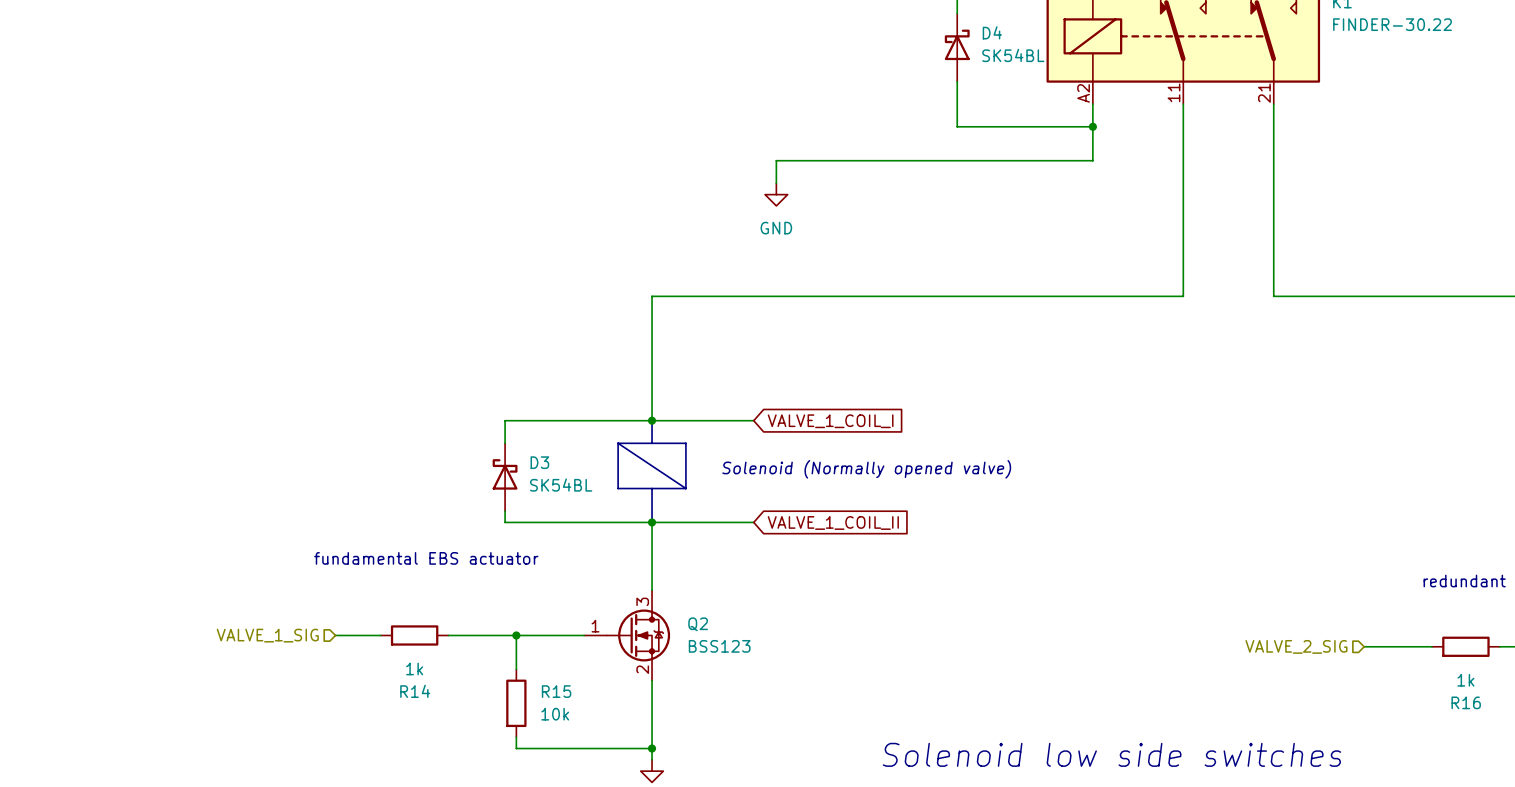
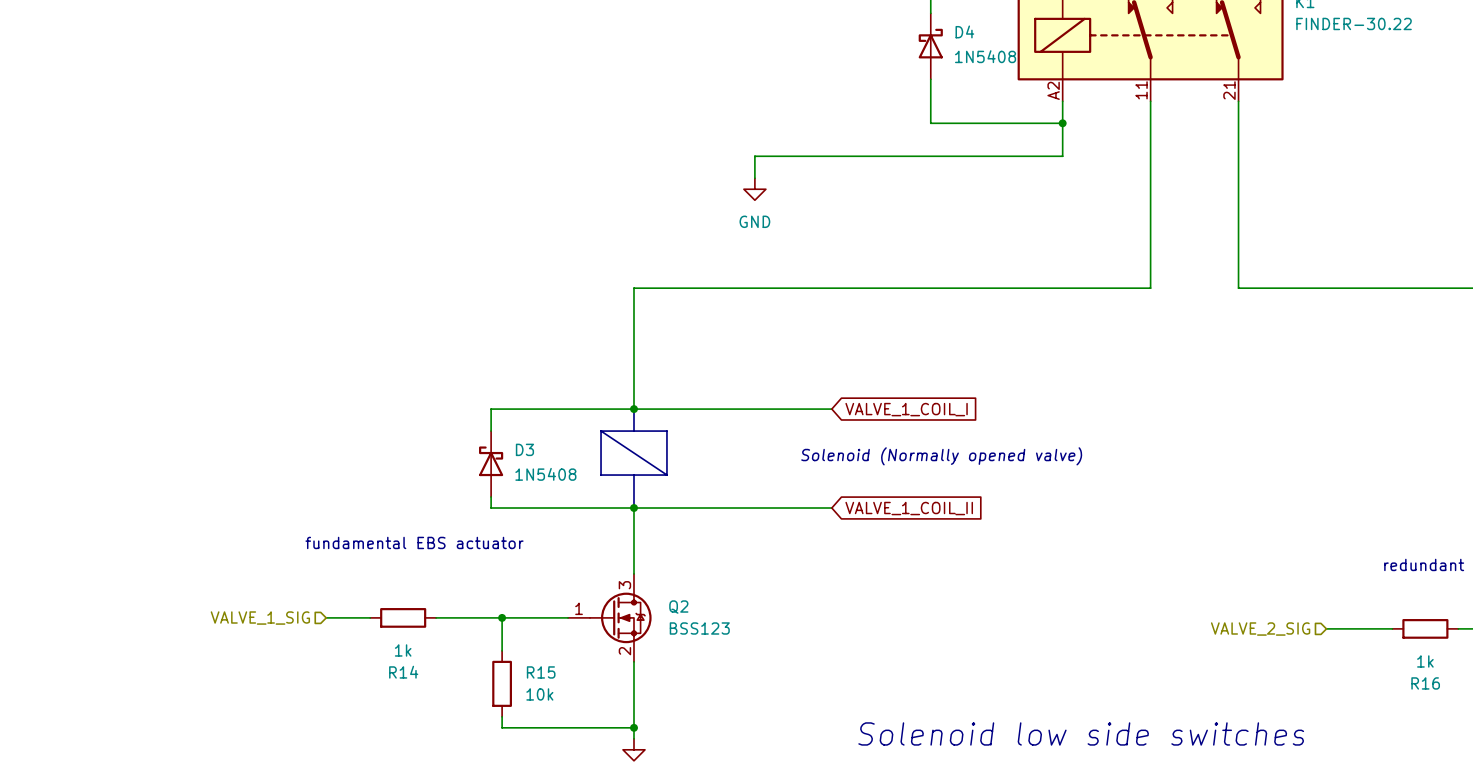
D4 value: SK54BL (1013, 55) -> 1N5408 (985, 56)
wire: none -> (732, 409) (831, 409)
global label position: VALVE_1_COIL_I (830, 421) -> VALVE_1_COIL_I (906, 409)
text position: Solenoid (Normally opened valve) (866, 469) -> Solenoid (Normally opened valve) (941, 456)
D3 value: SK54BL (561, 485) -> 1N5408 (545, 474)
wire: none -> (732, 508) (831, 508)
global label position: VALVE_1_COIL_II (833, 522) -> VALVE_1_COIL_II (909, 508)

